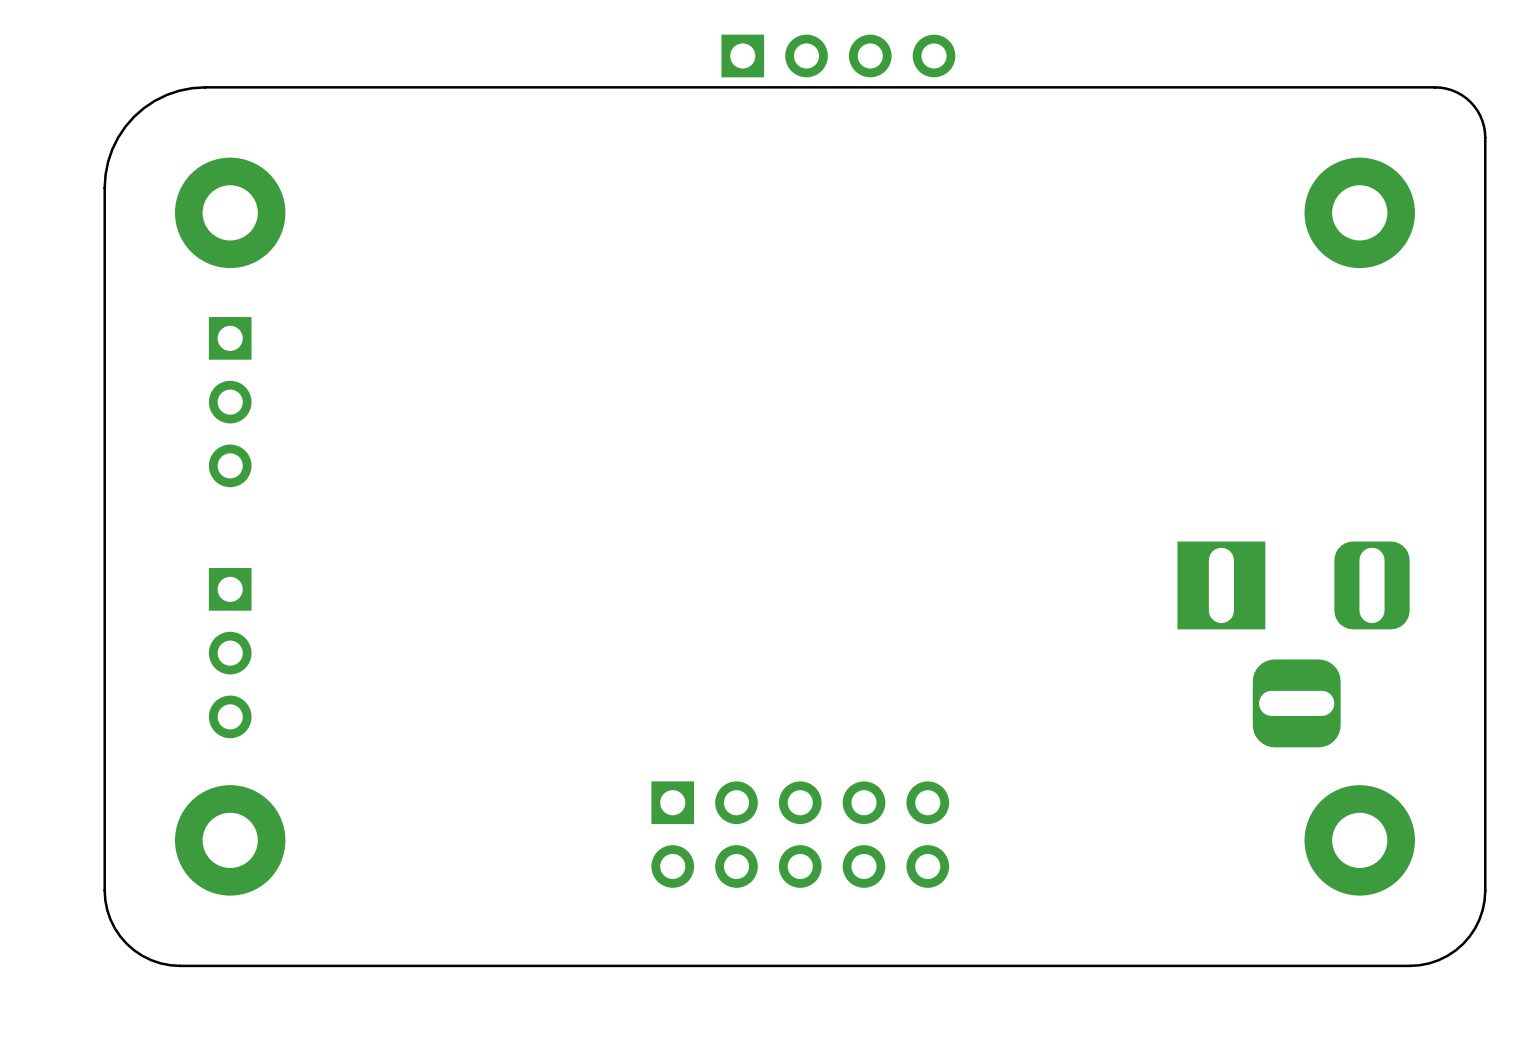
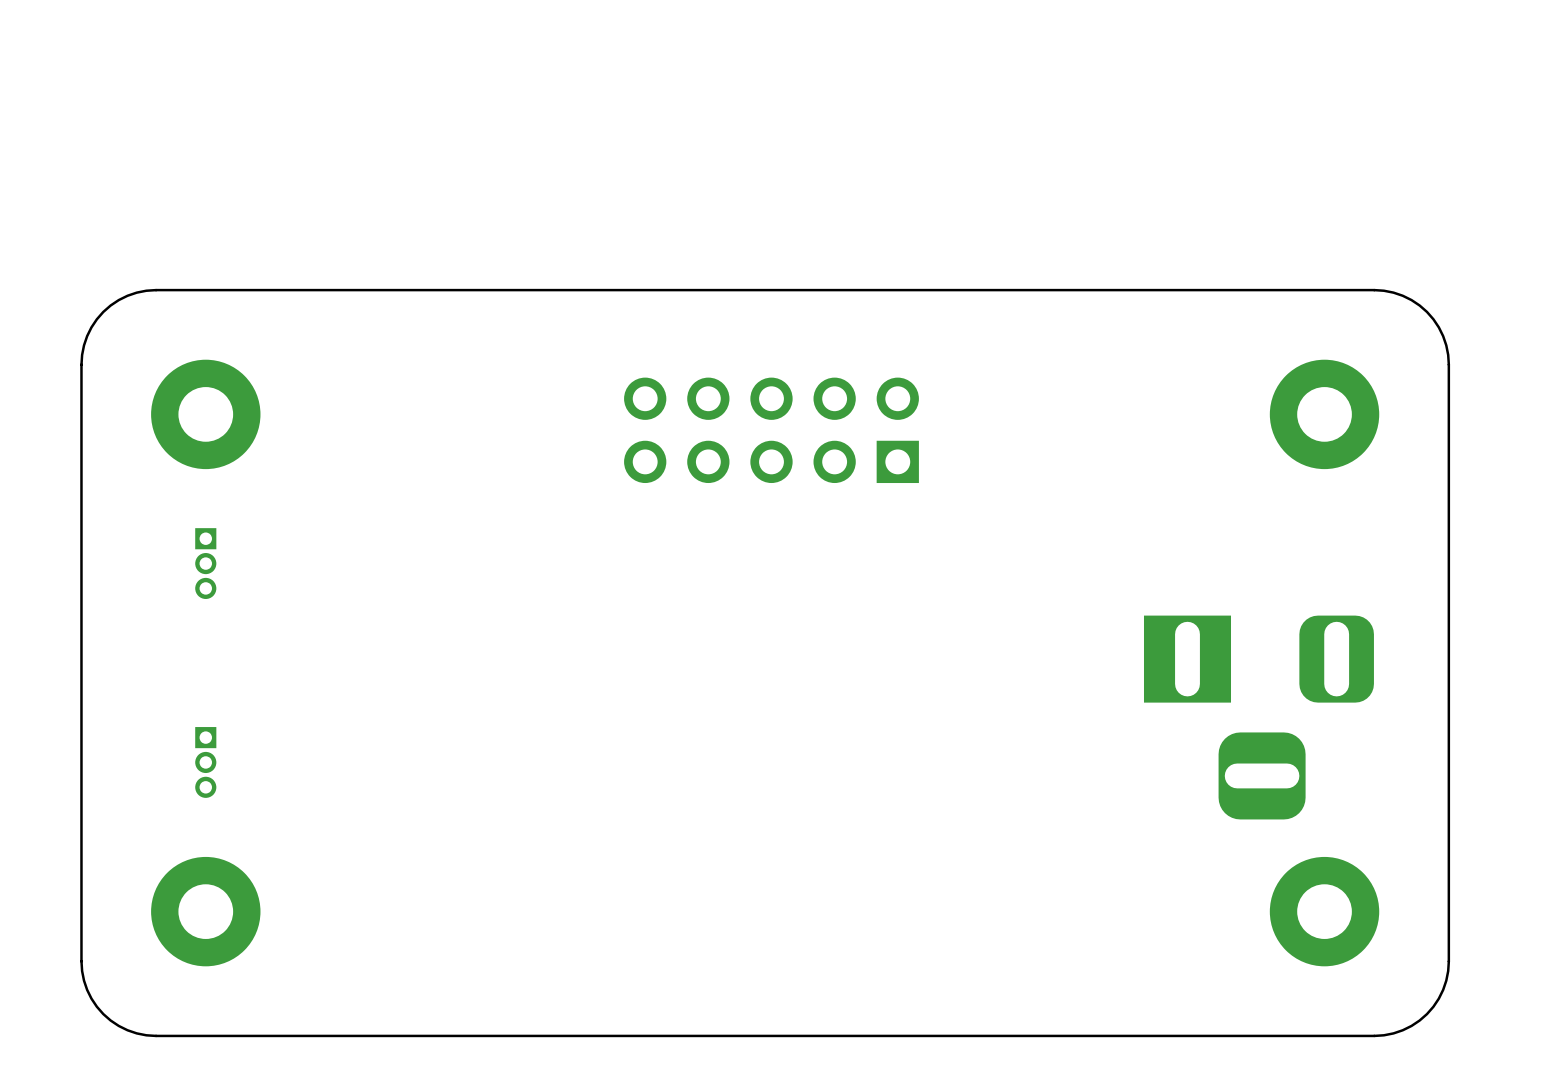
part: (838, 55) -> none
part position: (230, 212) -> (205, 414)
part position: (1359, 212) -> (1324, 414)
board edge: (1485, 288) (1484, 126) (1477, 110) (1466, 98) (1451, 90) (1435, 87) (192, 88) (166, 94) (143, 108) (125, 126) (112, 149) (108, 161) (104, 187) (104, 288) -> (1448, 364) (1443, 336) (1426, 311) (1402, 295) (1374, 290) (156, 290) (127, 295) (103, 311) (87, 336) (81, 364)
part: (230, 402) -> none
part: none -> (205, 563)
part: (230, 653) -> none
part: none -> (205, 762)
part rotation: 0° (800, 834) -> 180° (771, 430)
part position: (800, 834) -> (771, 430)

